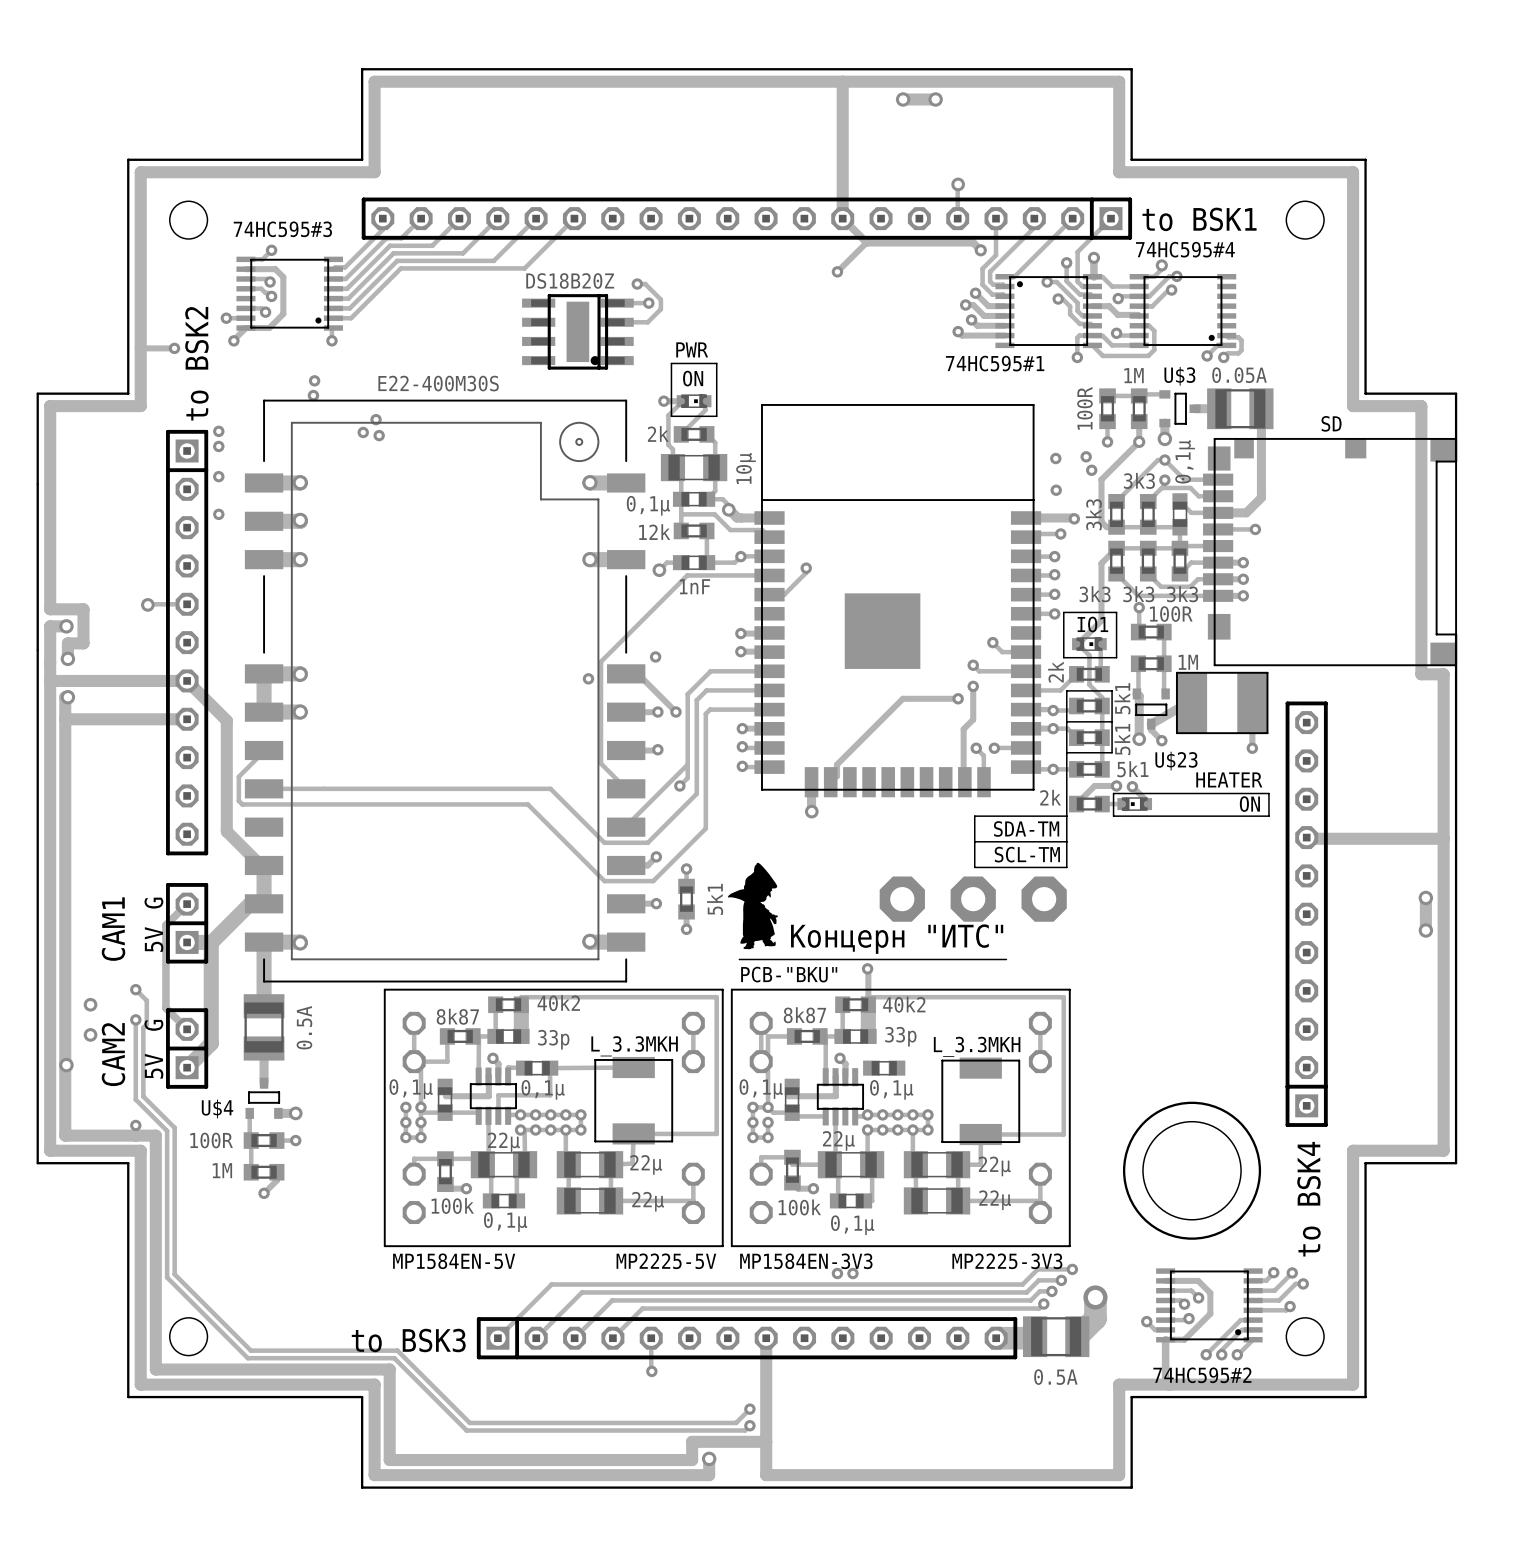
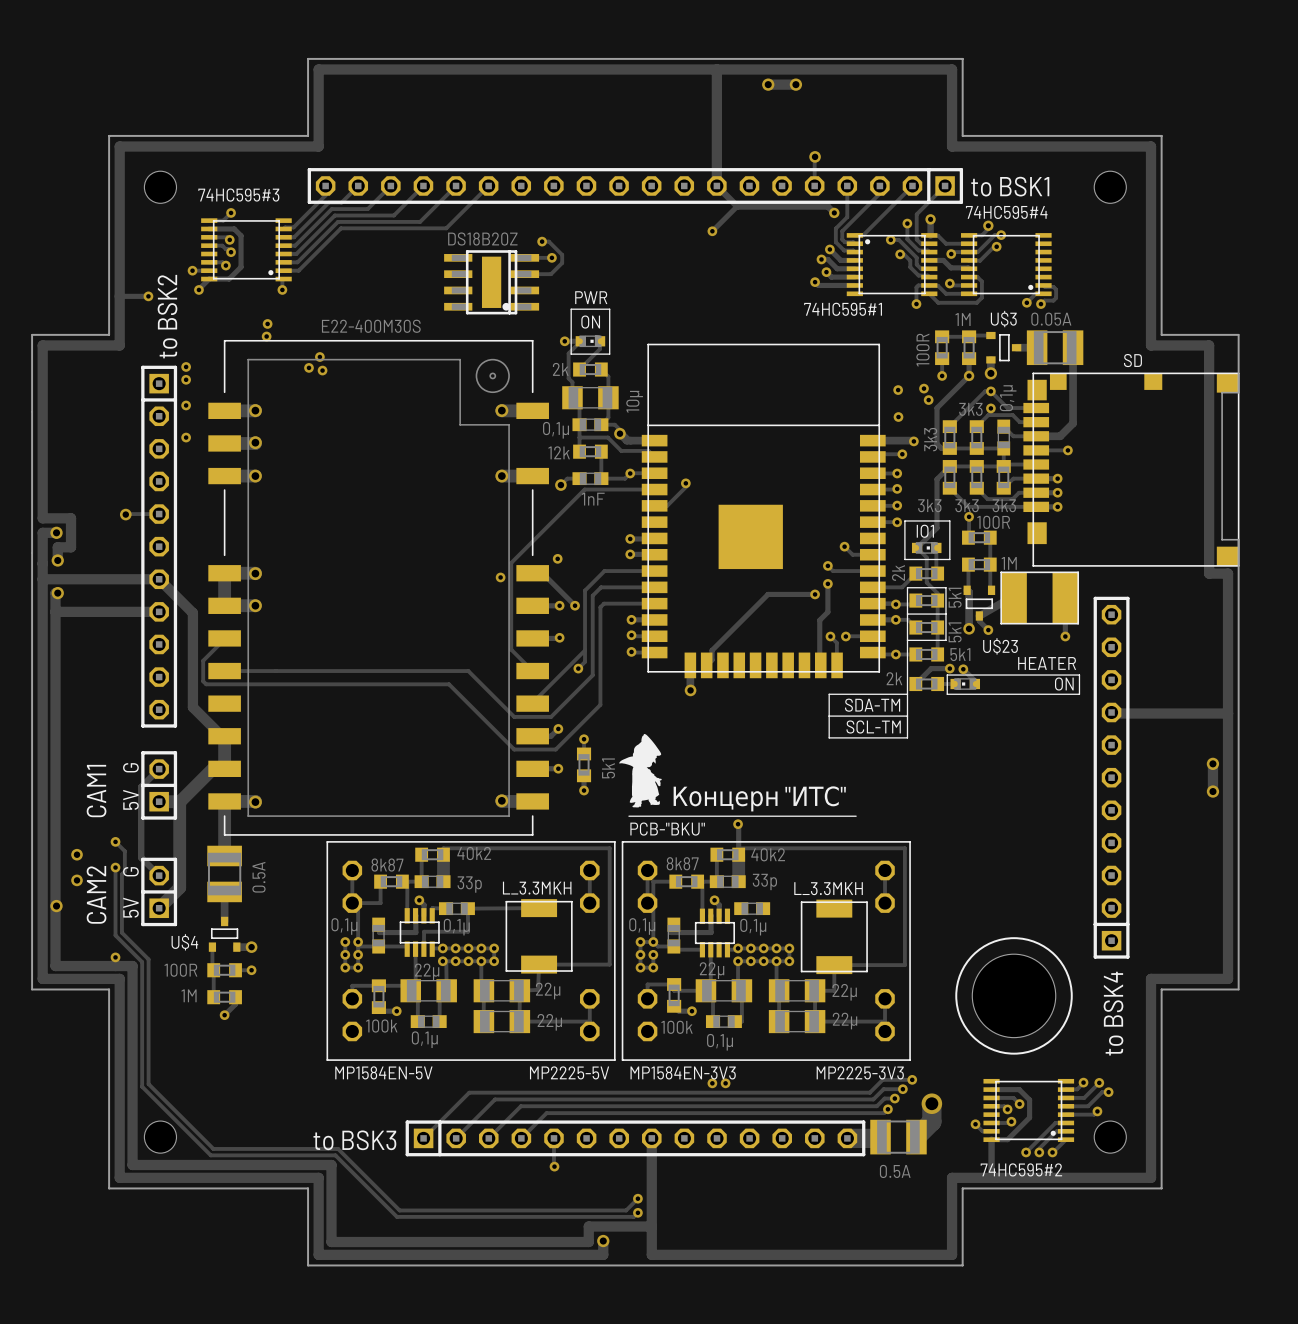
part: (973, 899) -> none

